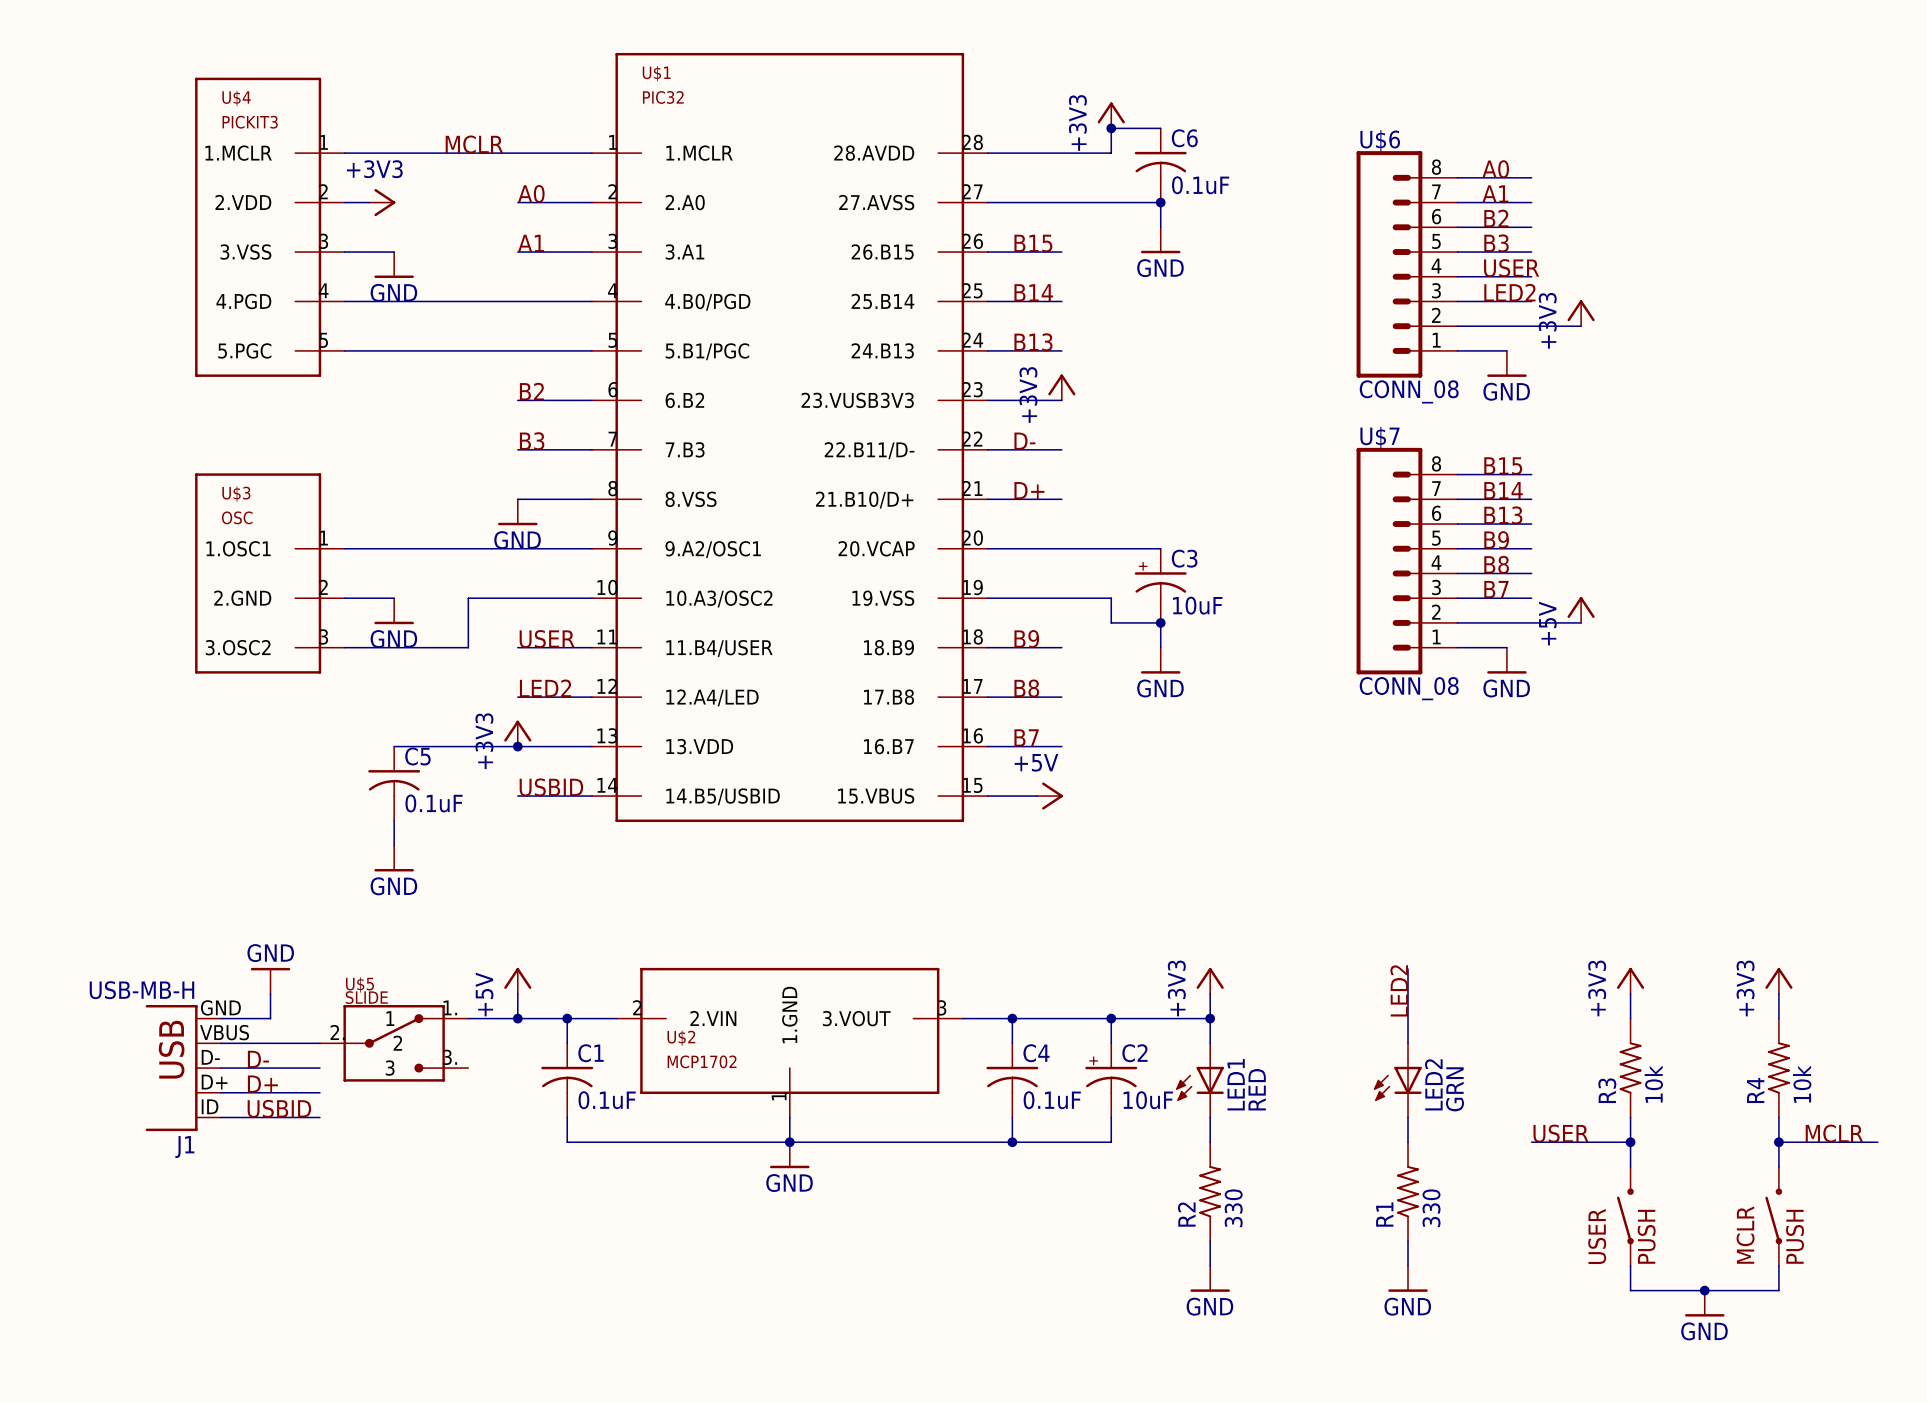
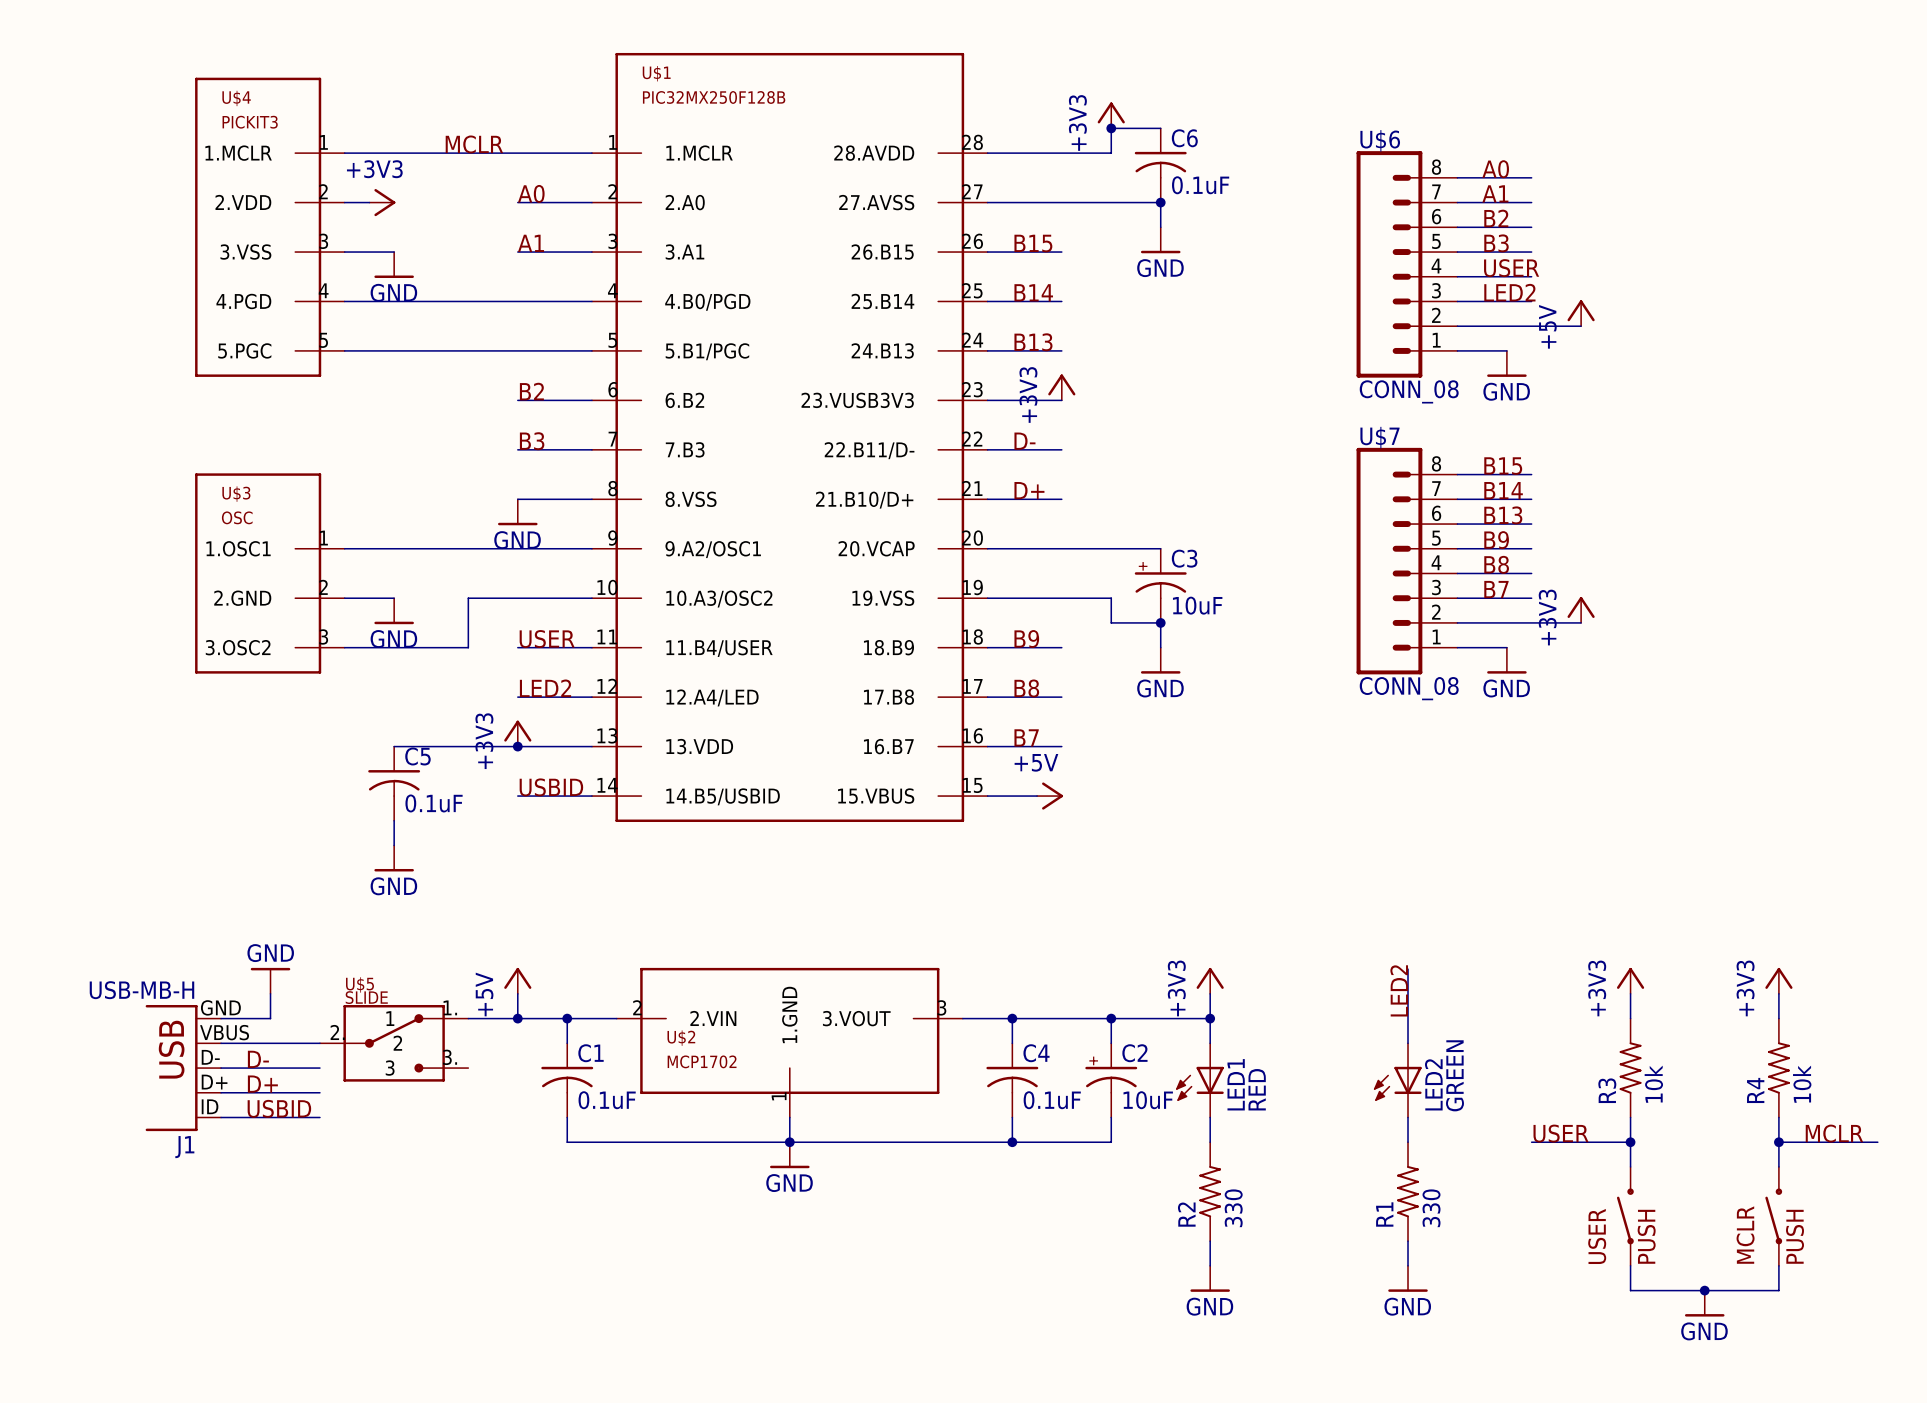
U$1 value: PIC32 (663, 97) -> PIC32MX250F128B (714, 97)
power symbol: +3V3 (1581, 313) -> +5V (1581, 313)
power symbol: +5V (1581, 609) -> +3V3 (1581, 609)
LED2 value: GRN (1455, 1089) -> GREEN (1455, 1075)

